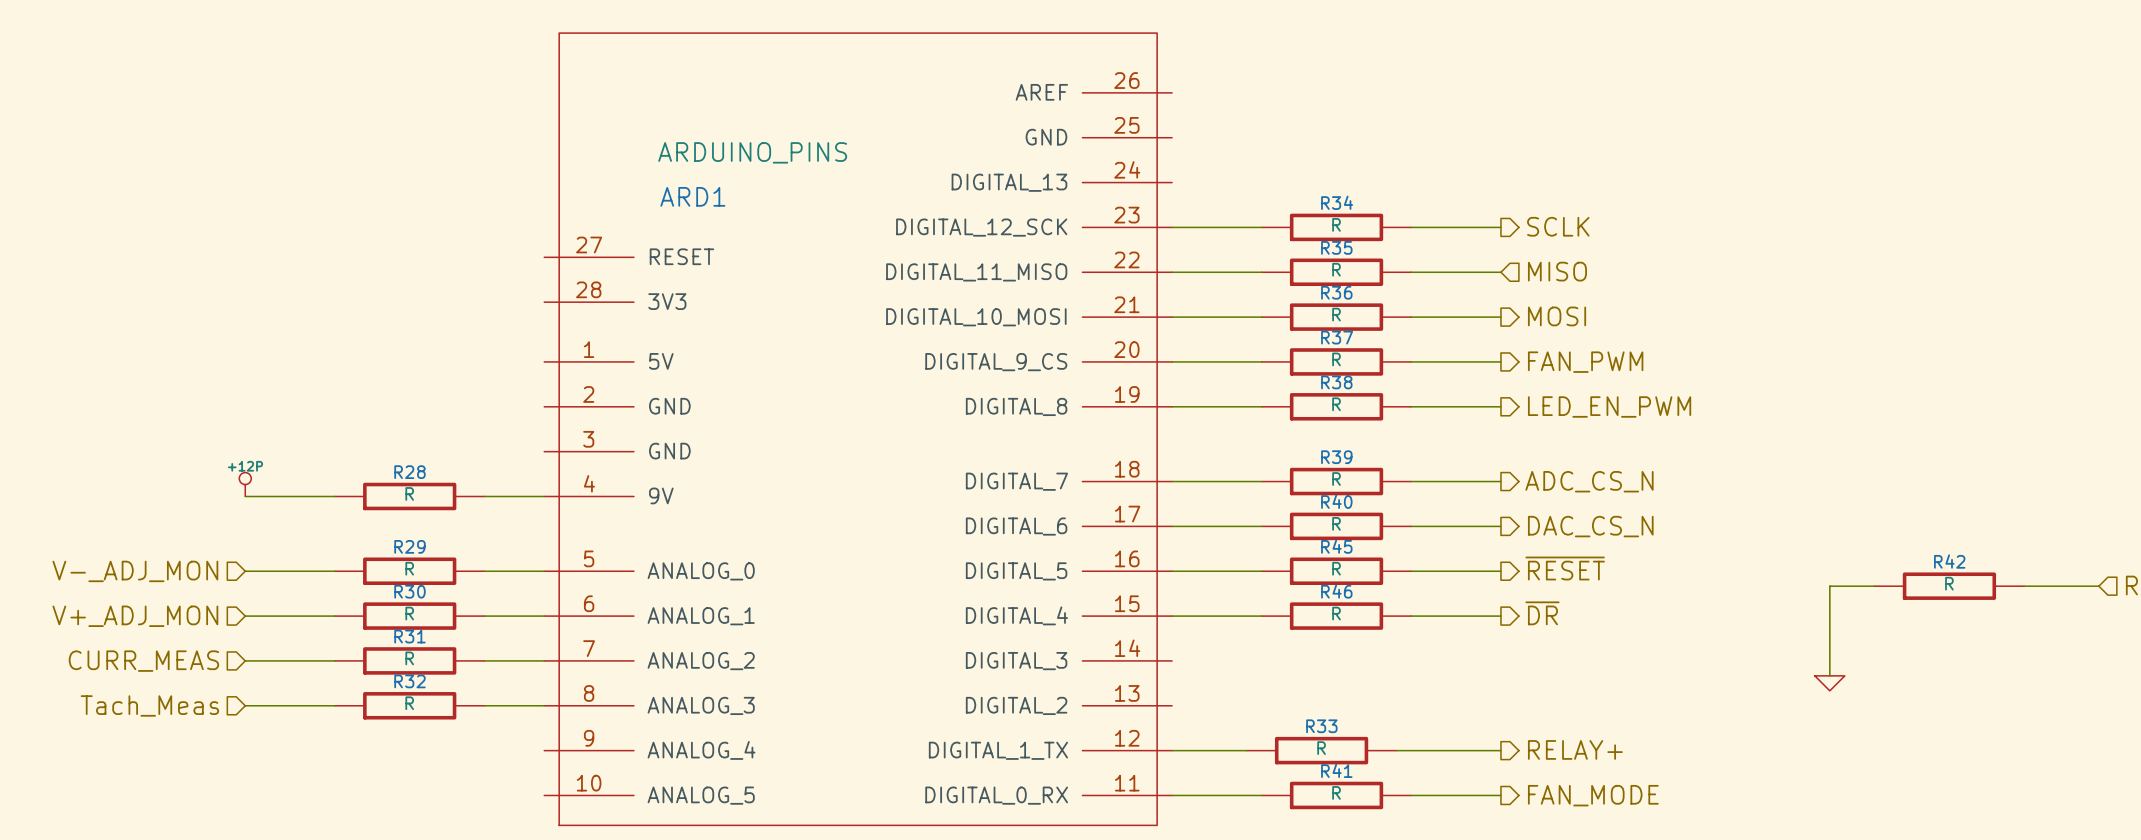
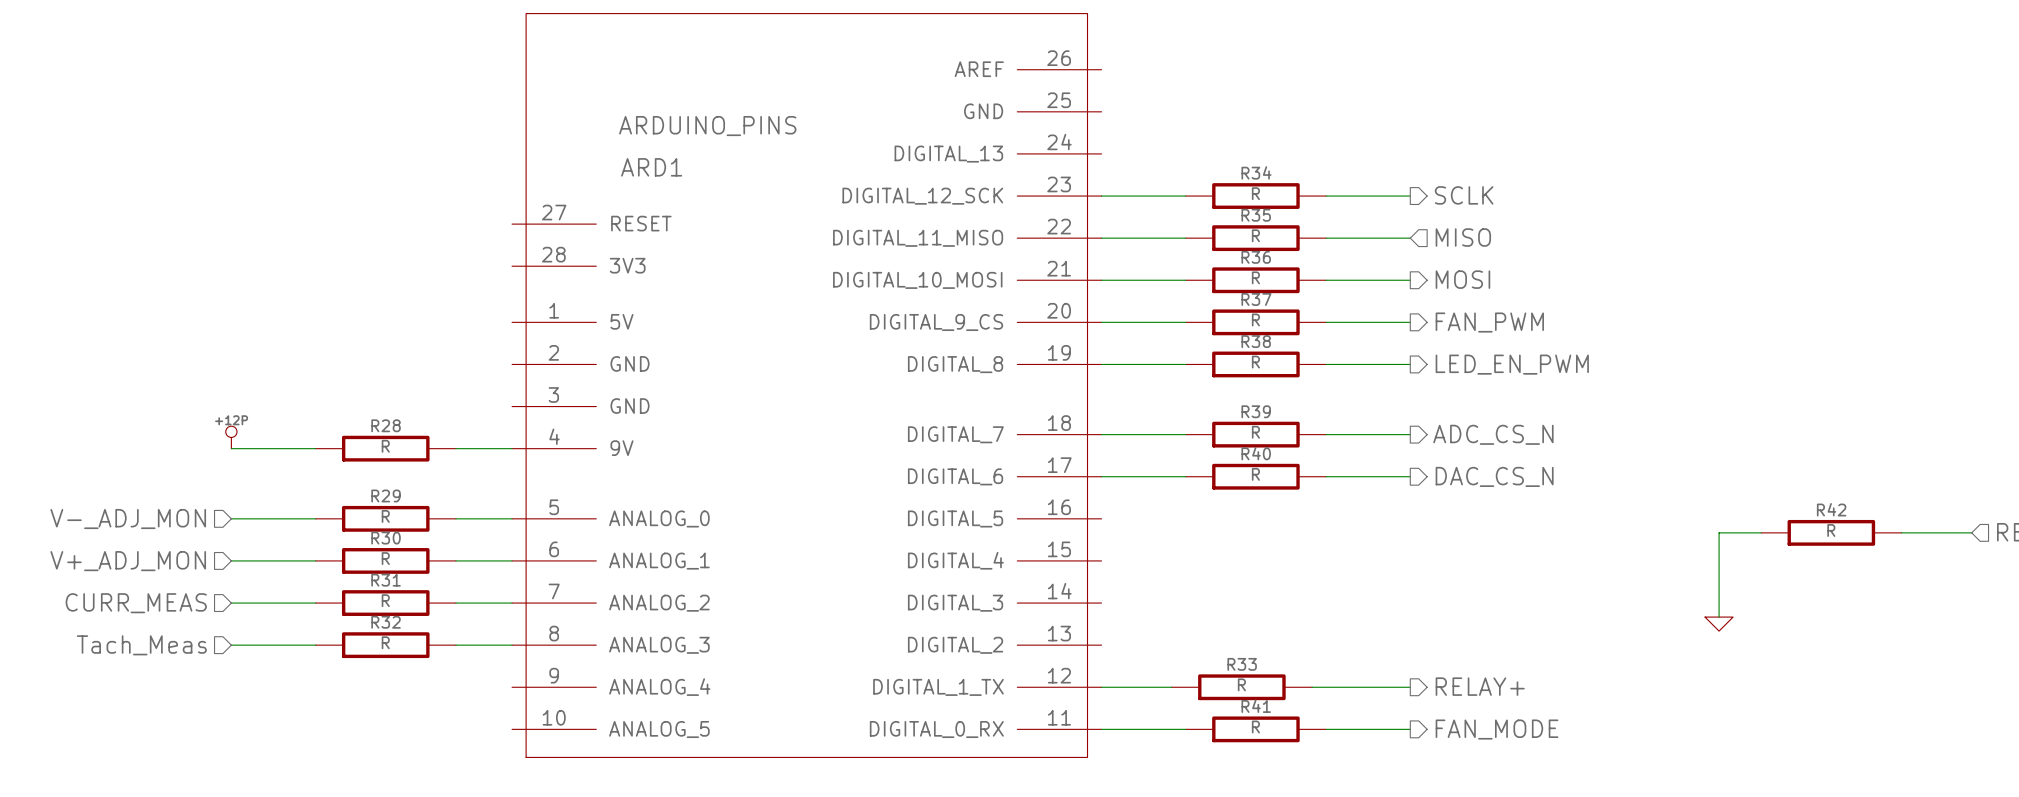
hierarchical label: ~{RESET} (1565, 568) -> none
wire: (1172, 571) (1261, 571) -> none
R45: R (1336, 571) -> none
wire: (1411, 571) (1500, 571) -> none
hierarchical label: ~{DR} (1542, 613) -> none
wire: (1172, 616) (1261, 616) -> none
R46: R (1336, 616) -> none
wire: (1411, 616) (1500, 616) -> none

